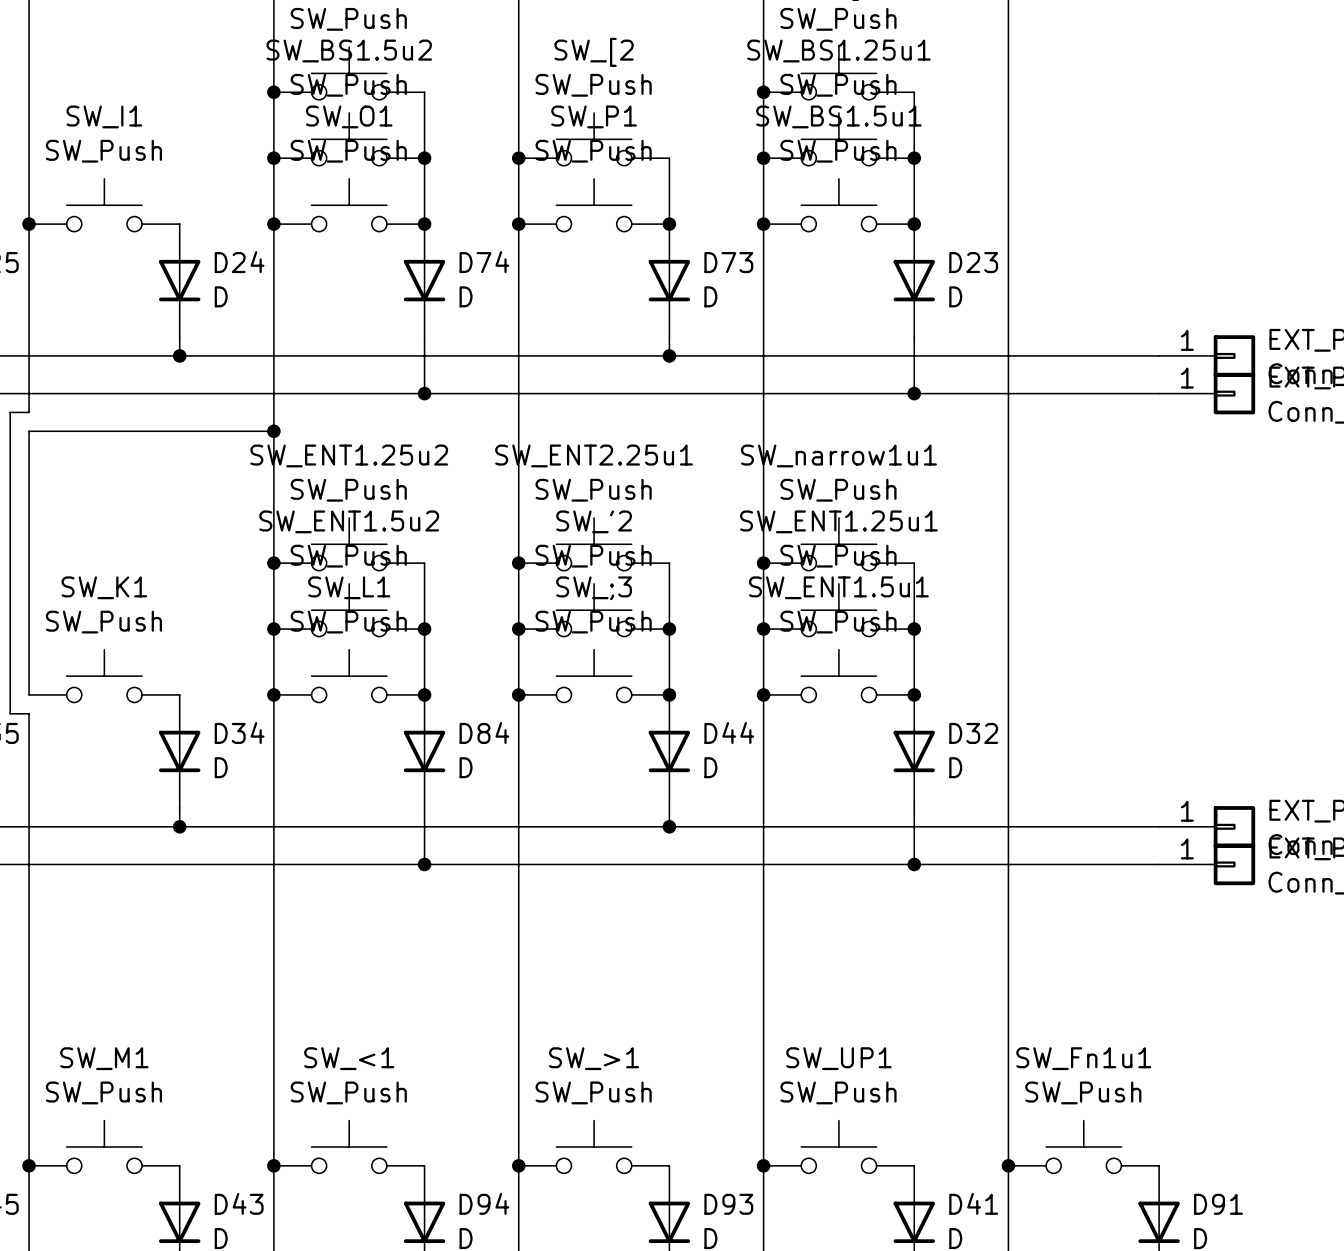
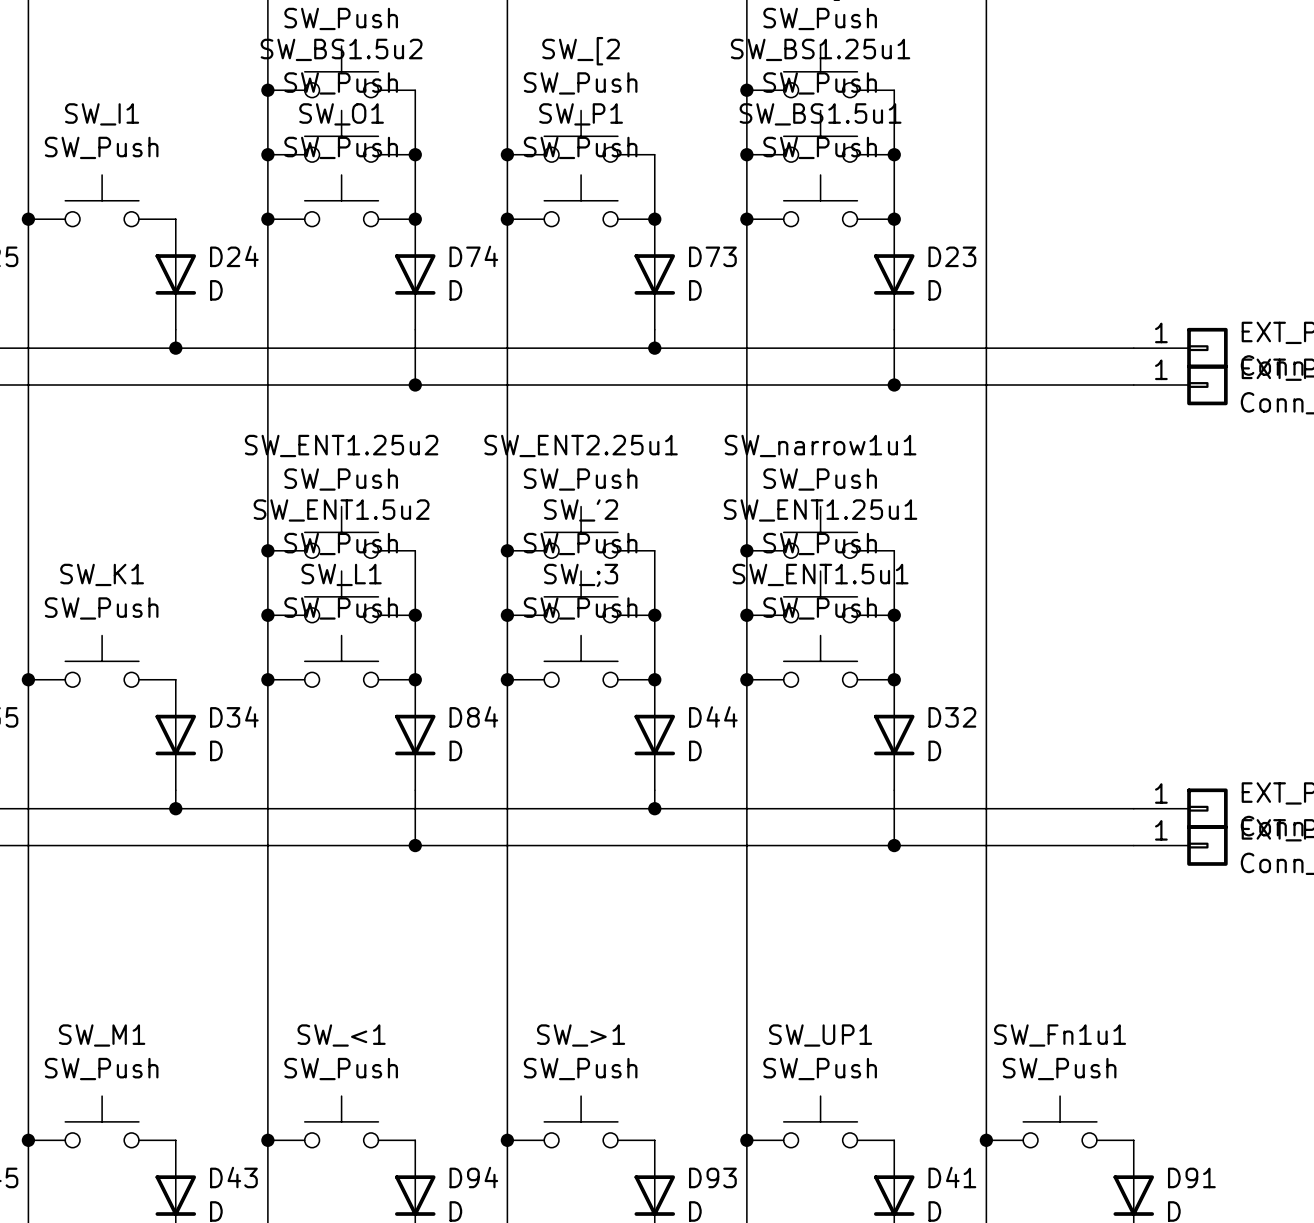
wire: (29, 412) (10, 412) (10, 713) (29, 713) -> (28, 679) (28, 698)
wire: (29, 431) (273, 431) -> (28, 421) (28, 403)
junction: (273, 431) -> none
junction: none -> (28, 679)

